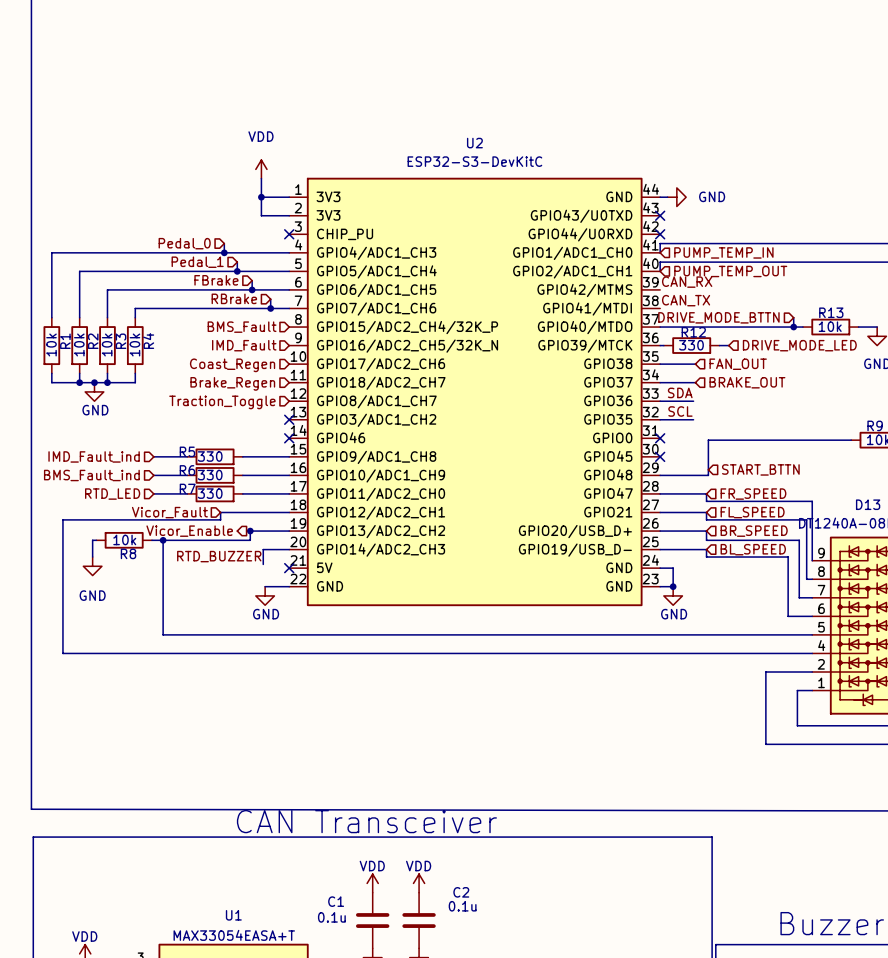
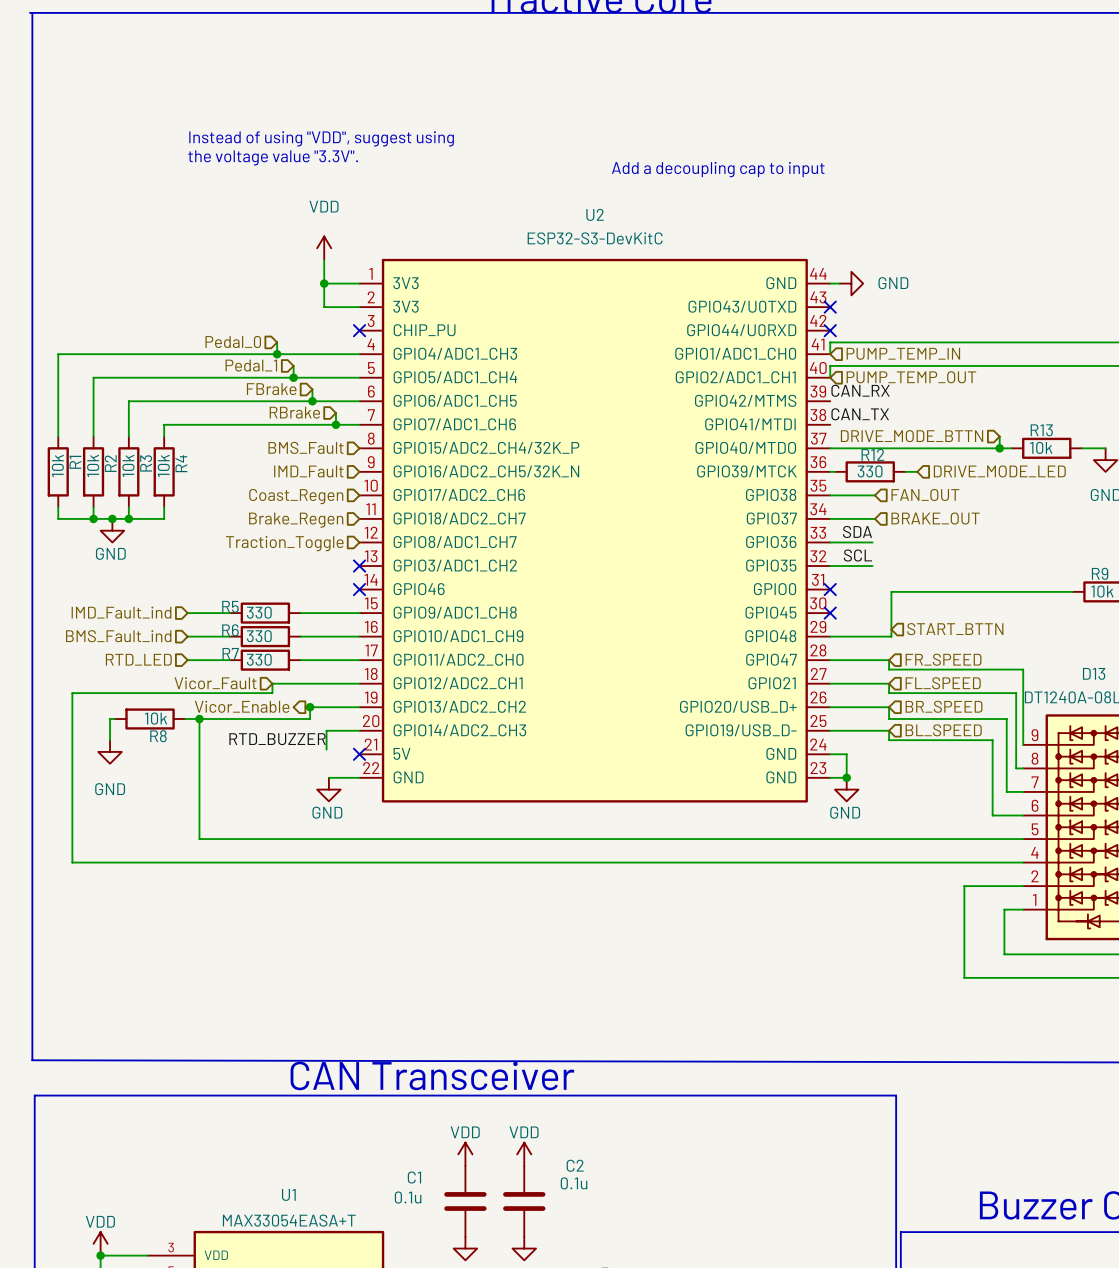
text: none -> Instead of using "VDD", suggest using (321, 138)
text: none -> the voltage value "3.3V". (273, 157)
text: none -> Add a decoupling cap to input (718, 169)

